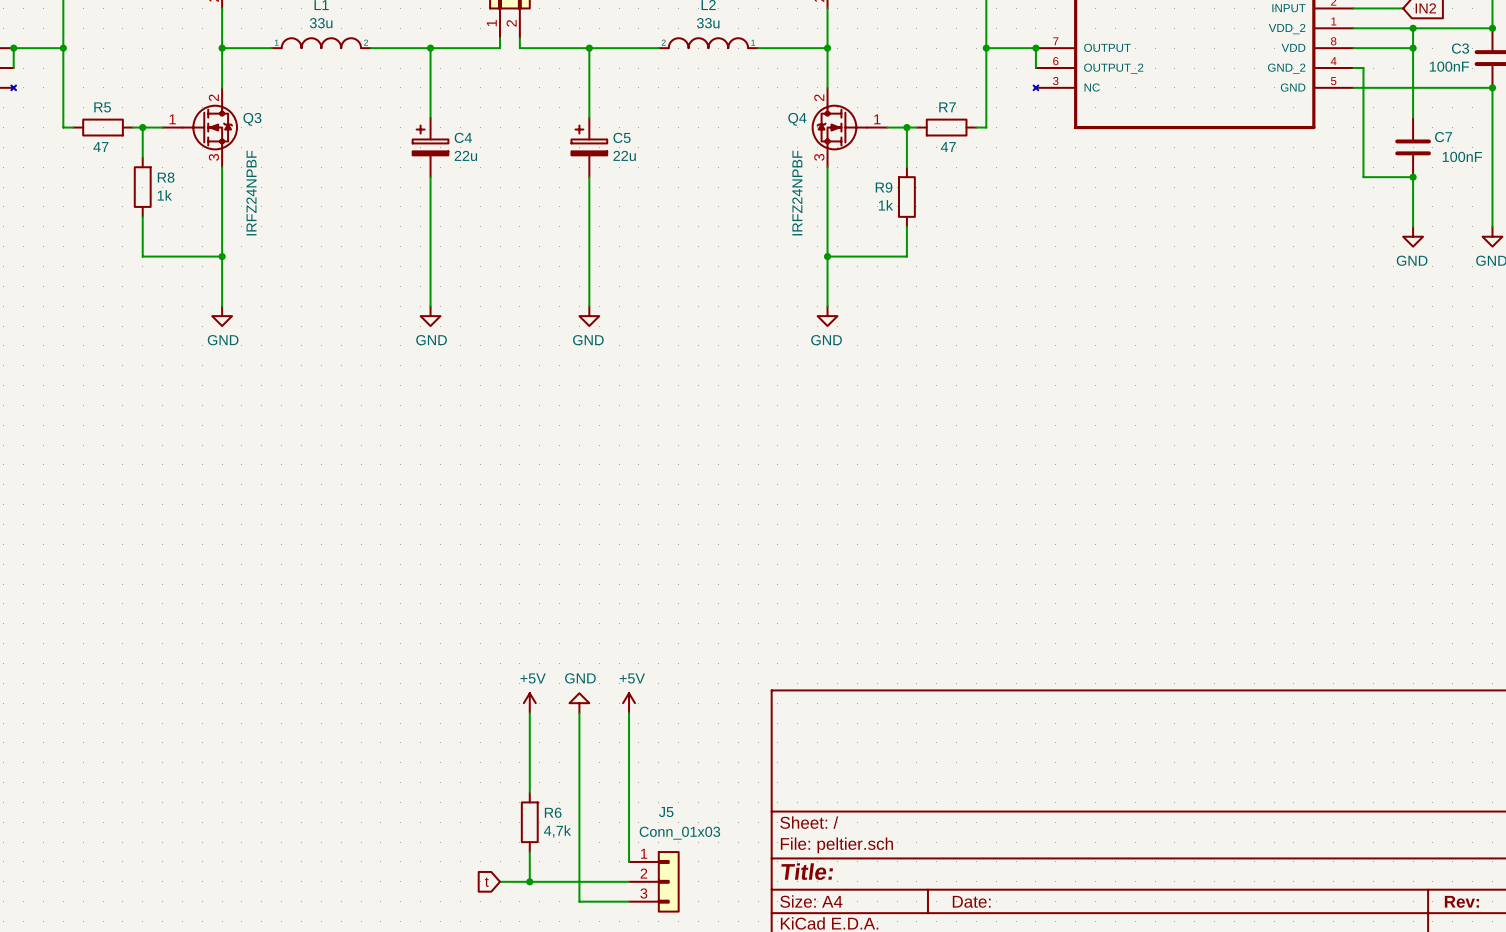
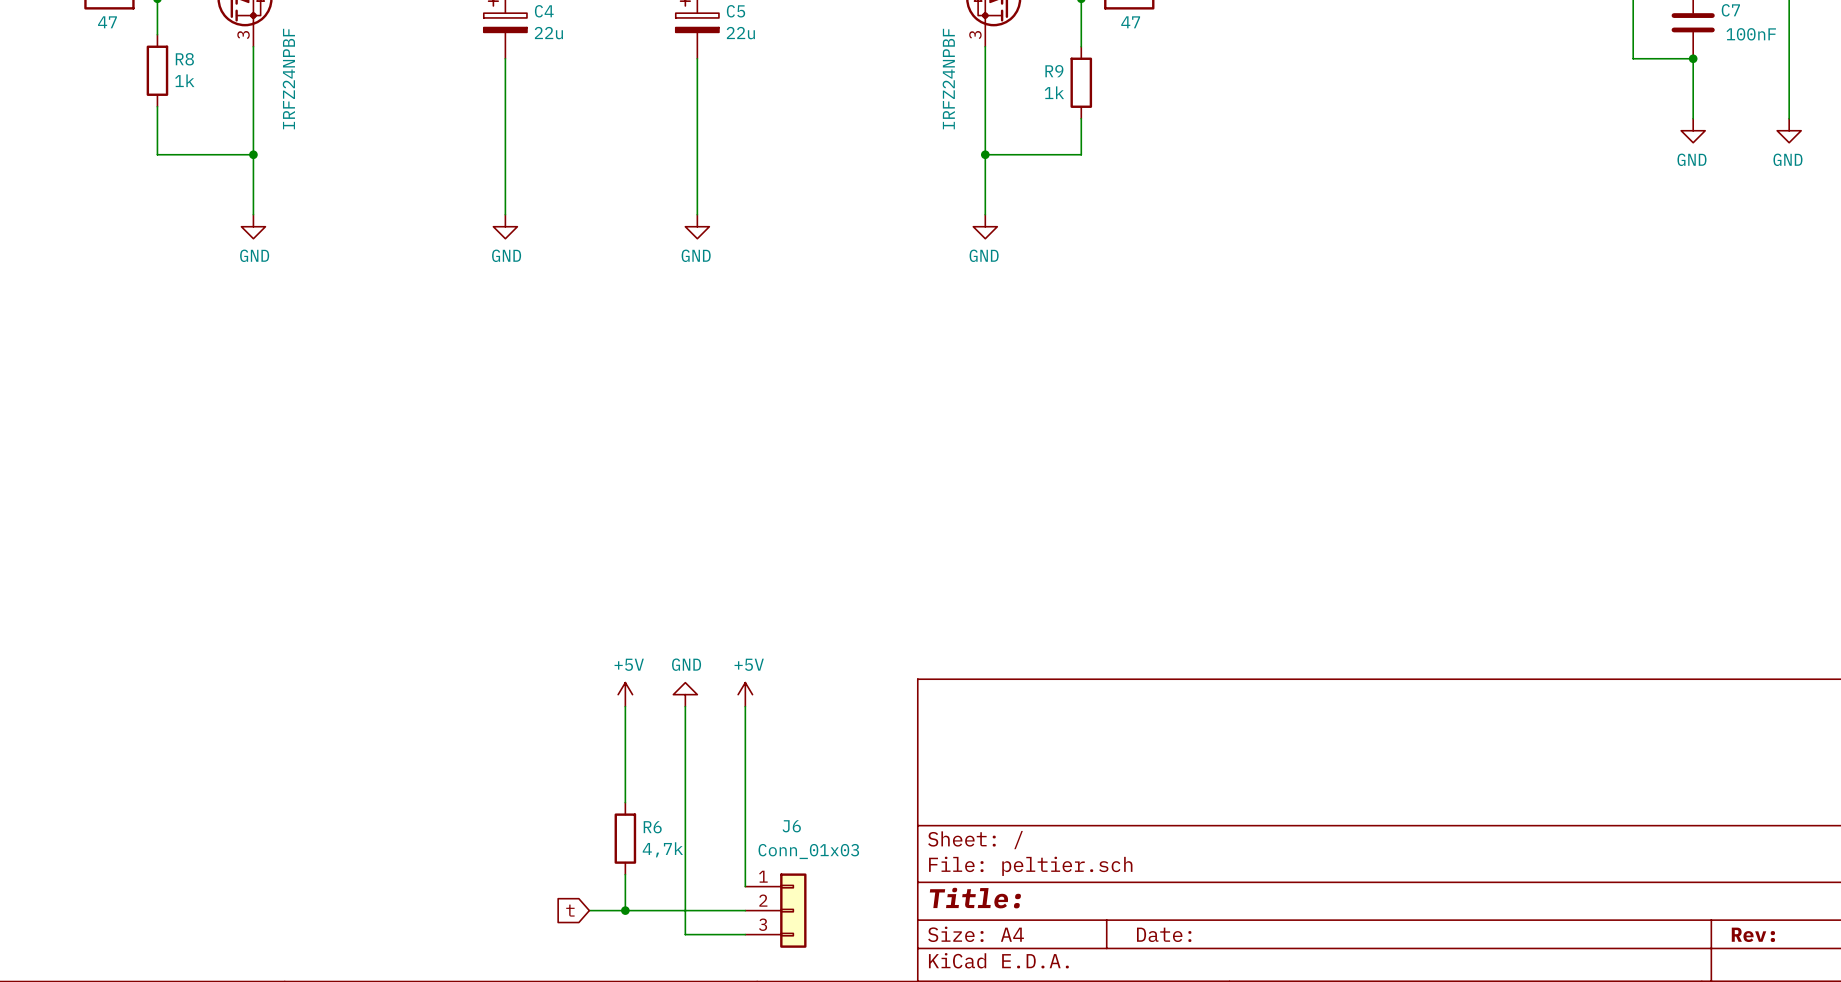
J5 name: J5 (666, 812) -> J6 (791, 826)

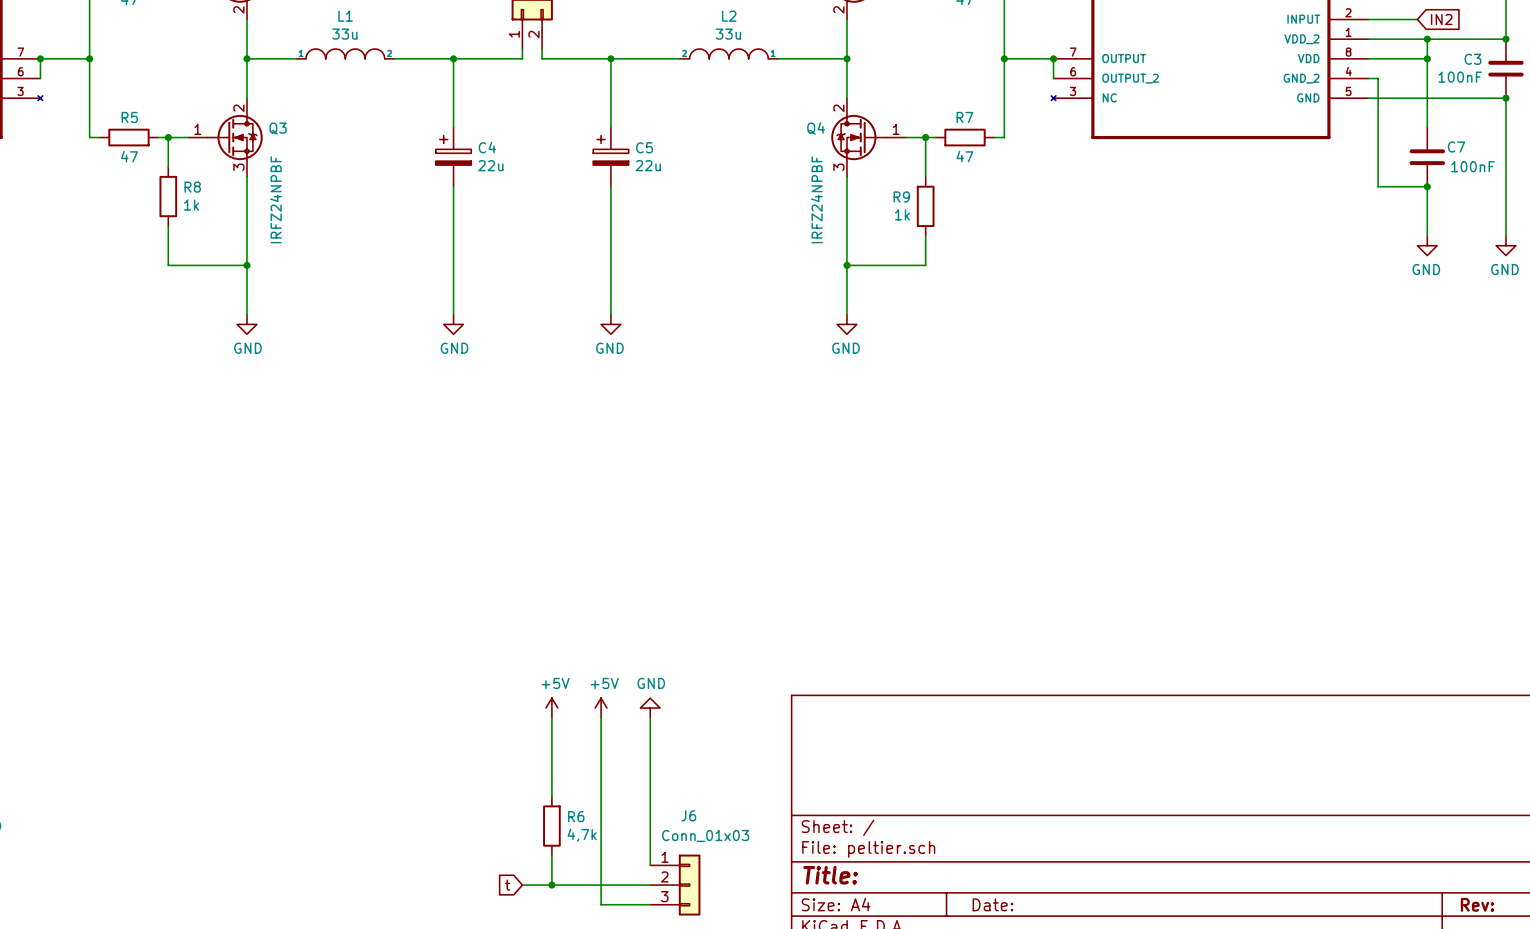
power symbol: GND (685, 694) -> +5V (601, 708)
power symbol: +5V (745, 694) -> GND (650, 708)

